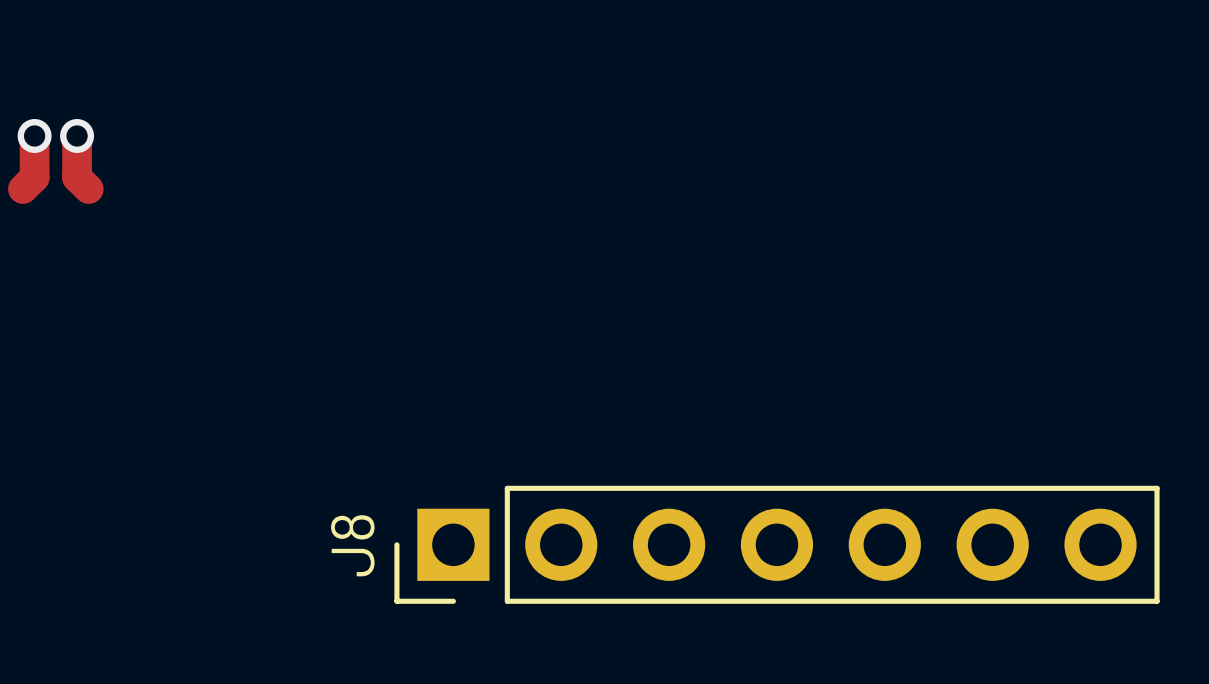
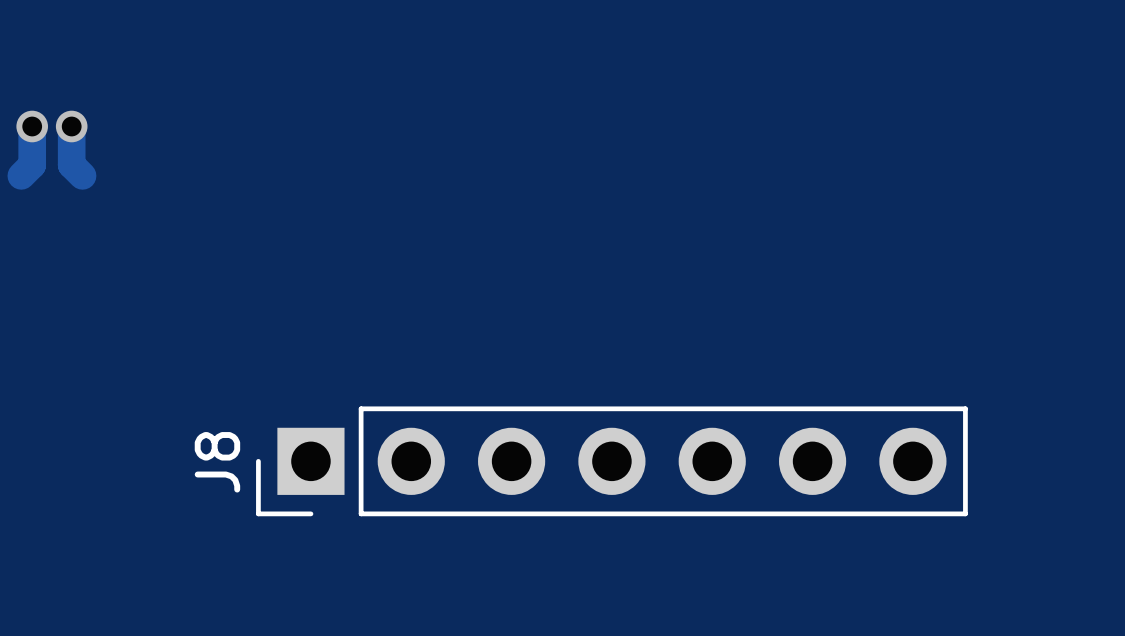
J8 position: (776, 544) -> (611, 461)

